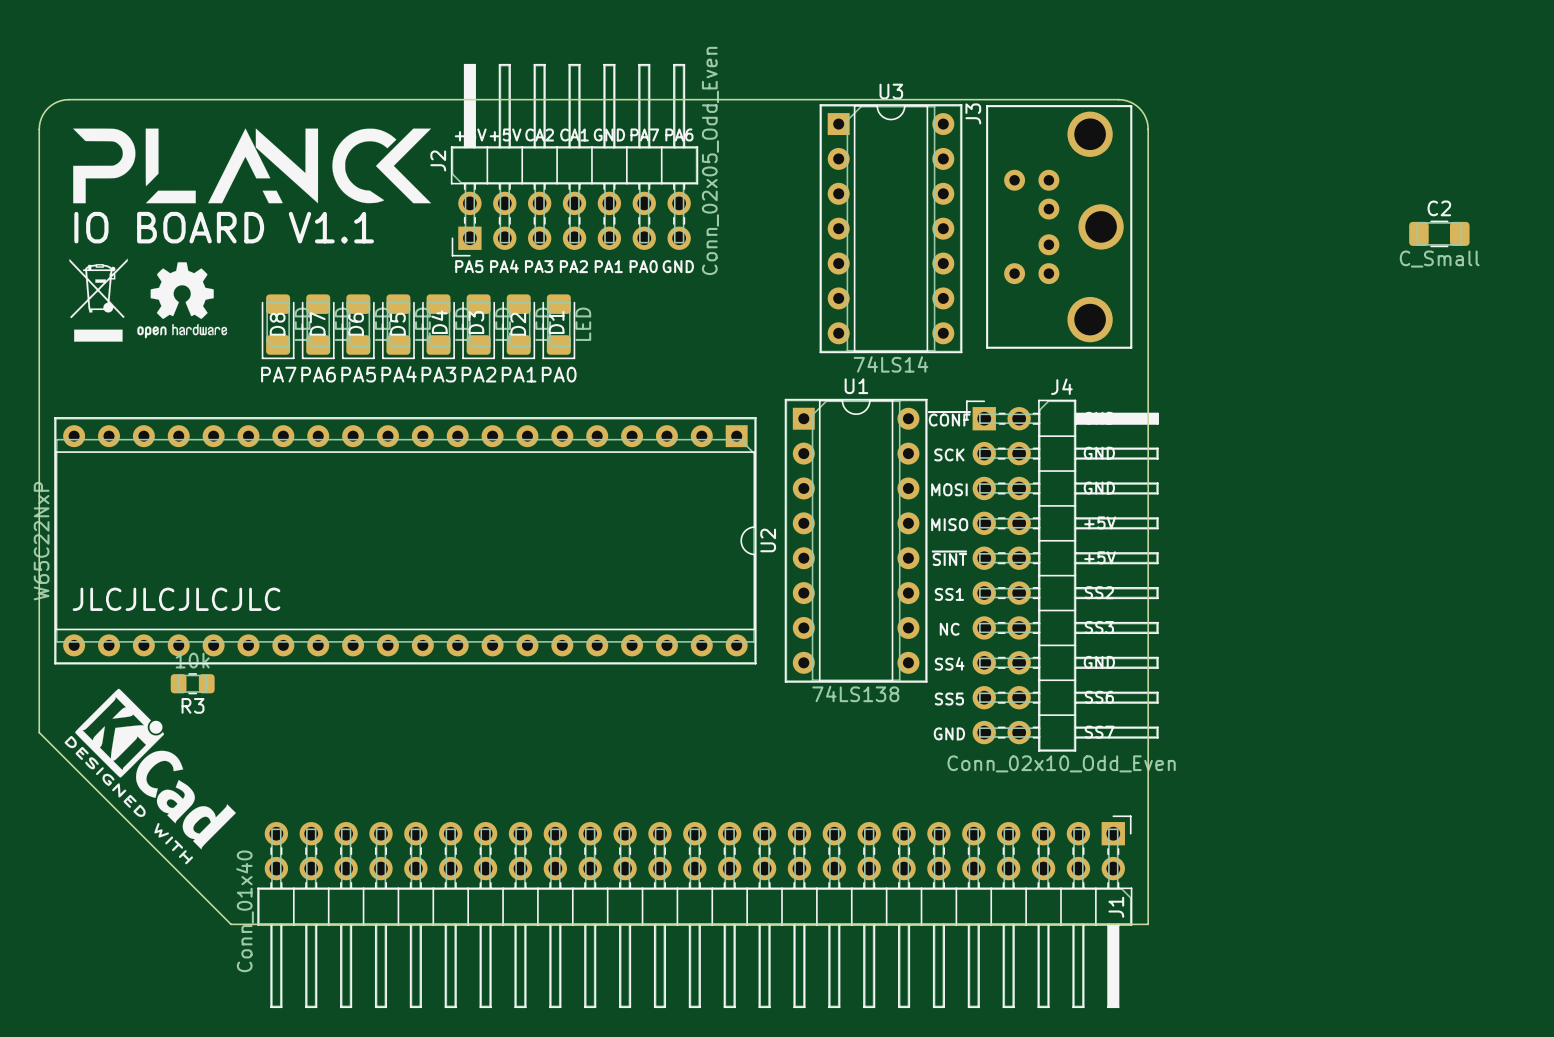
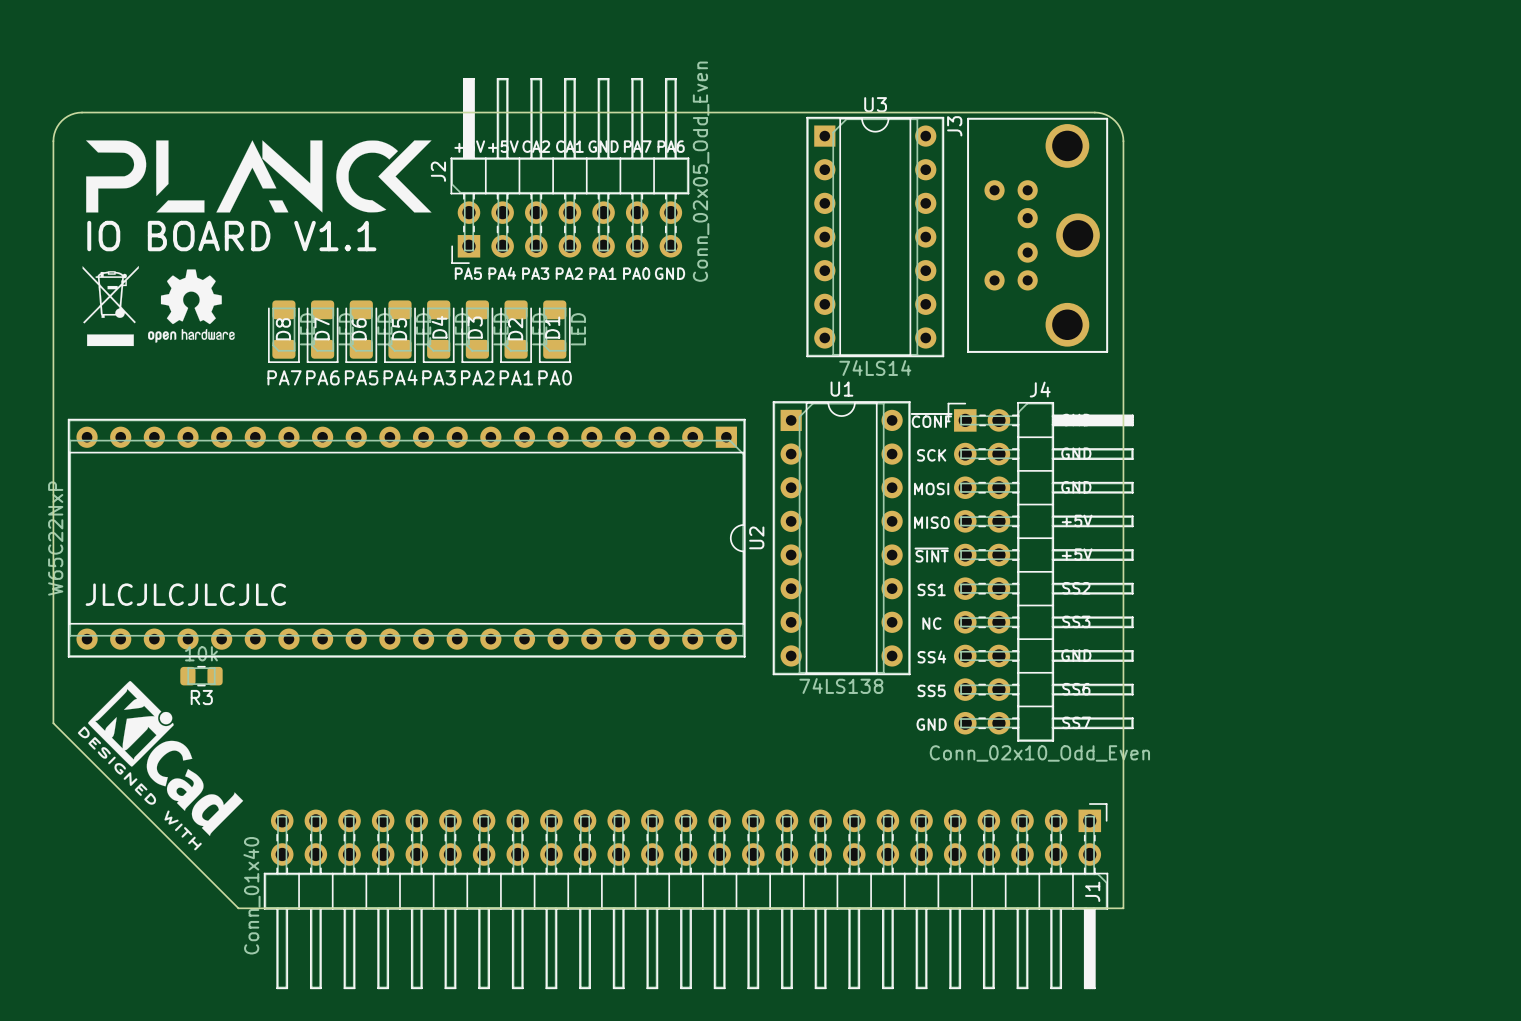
C2: C_Small (1439, 233) -> none

